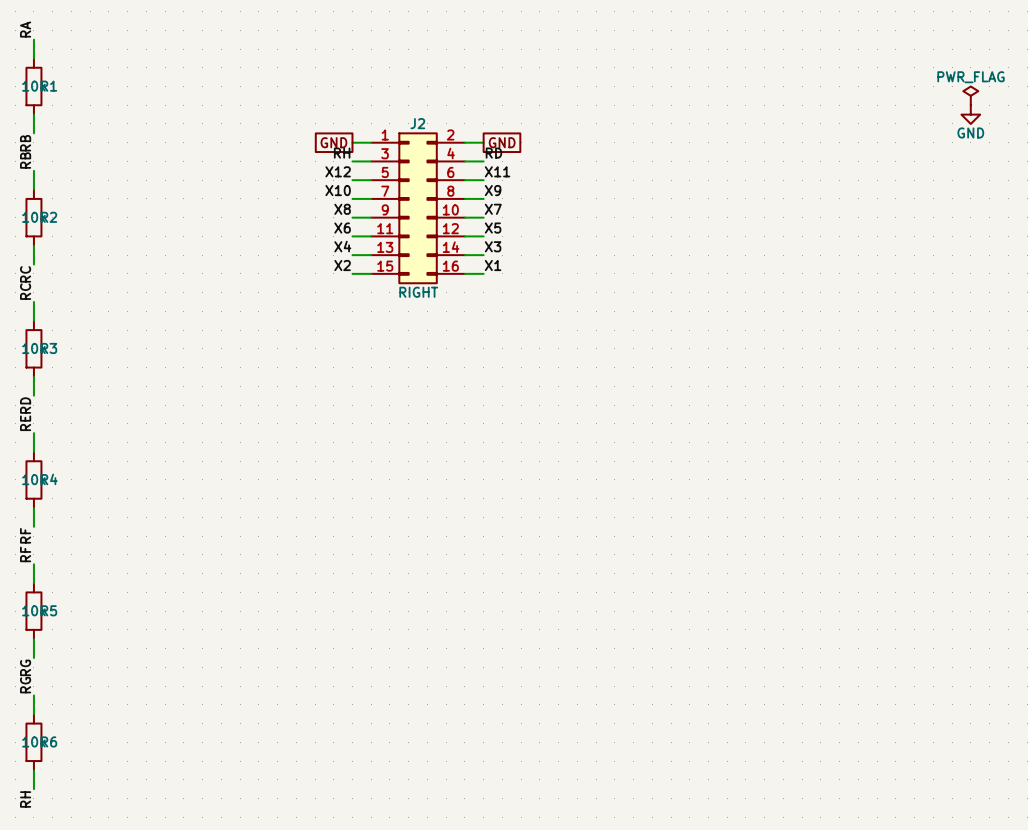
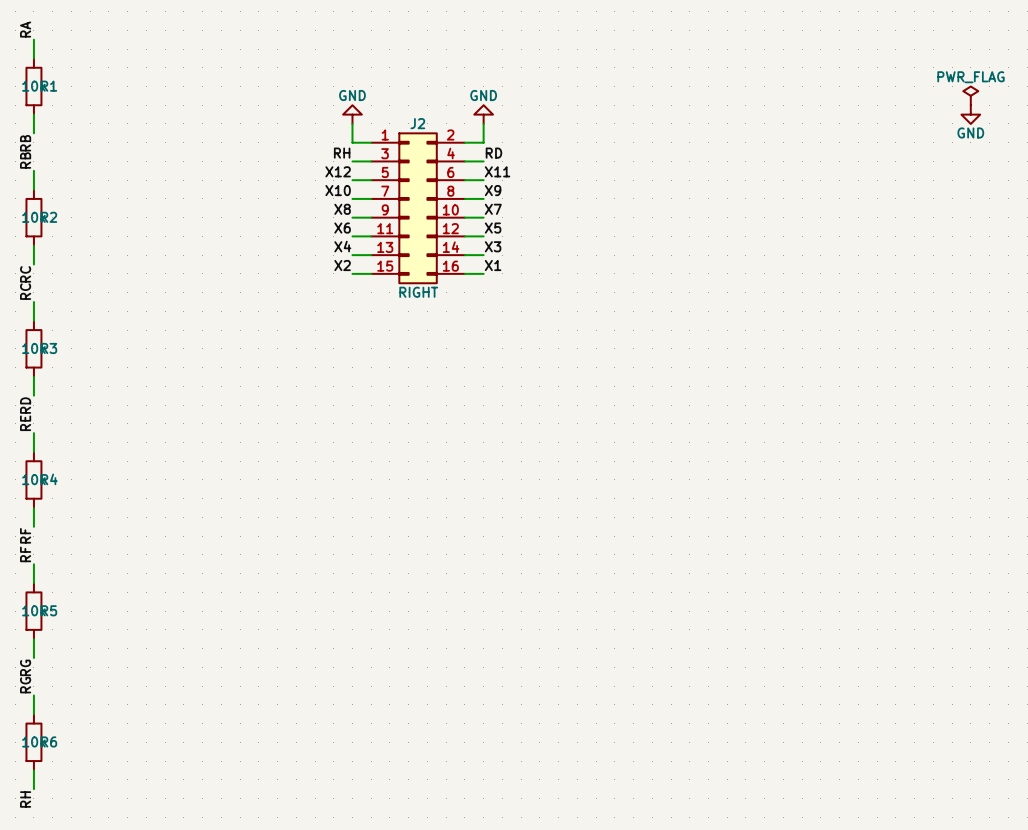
power symbol: none -> GND (352, 114)
power symbol: none -> GND (483, 114)
wire: none -> (483, 123) (483, 142)
global label: GND (333, 142) -> none
global label: GND (502, 142) -> none

